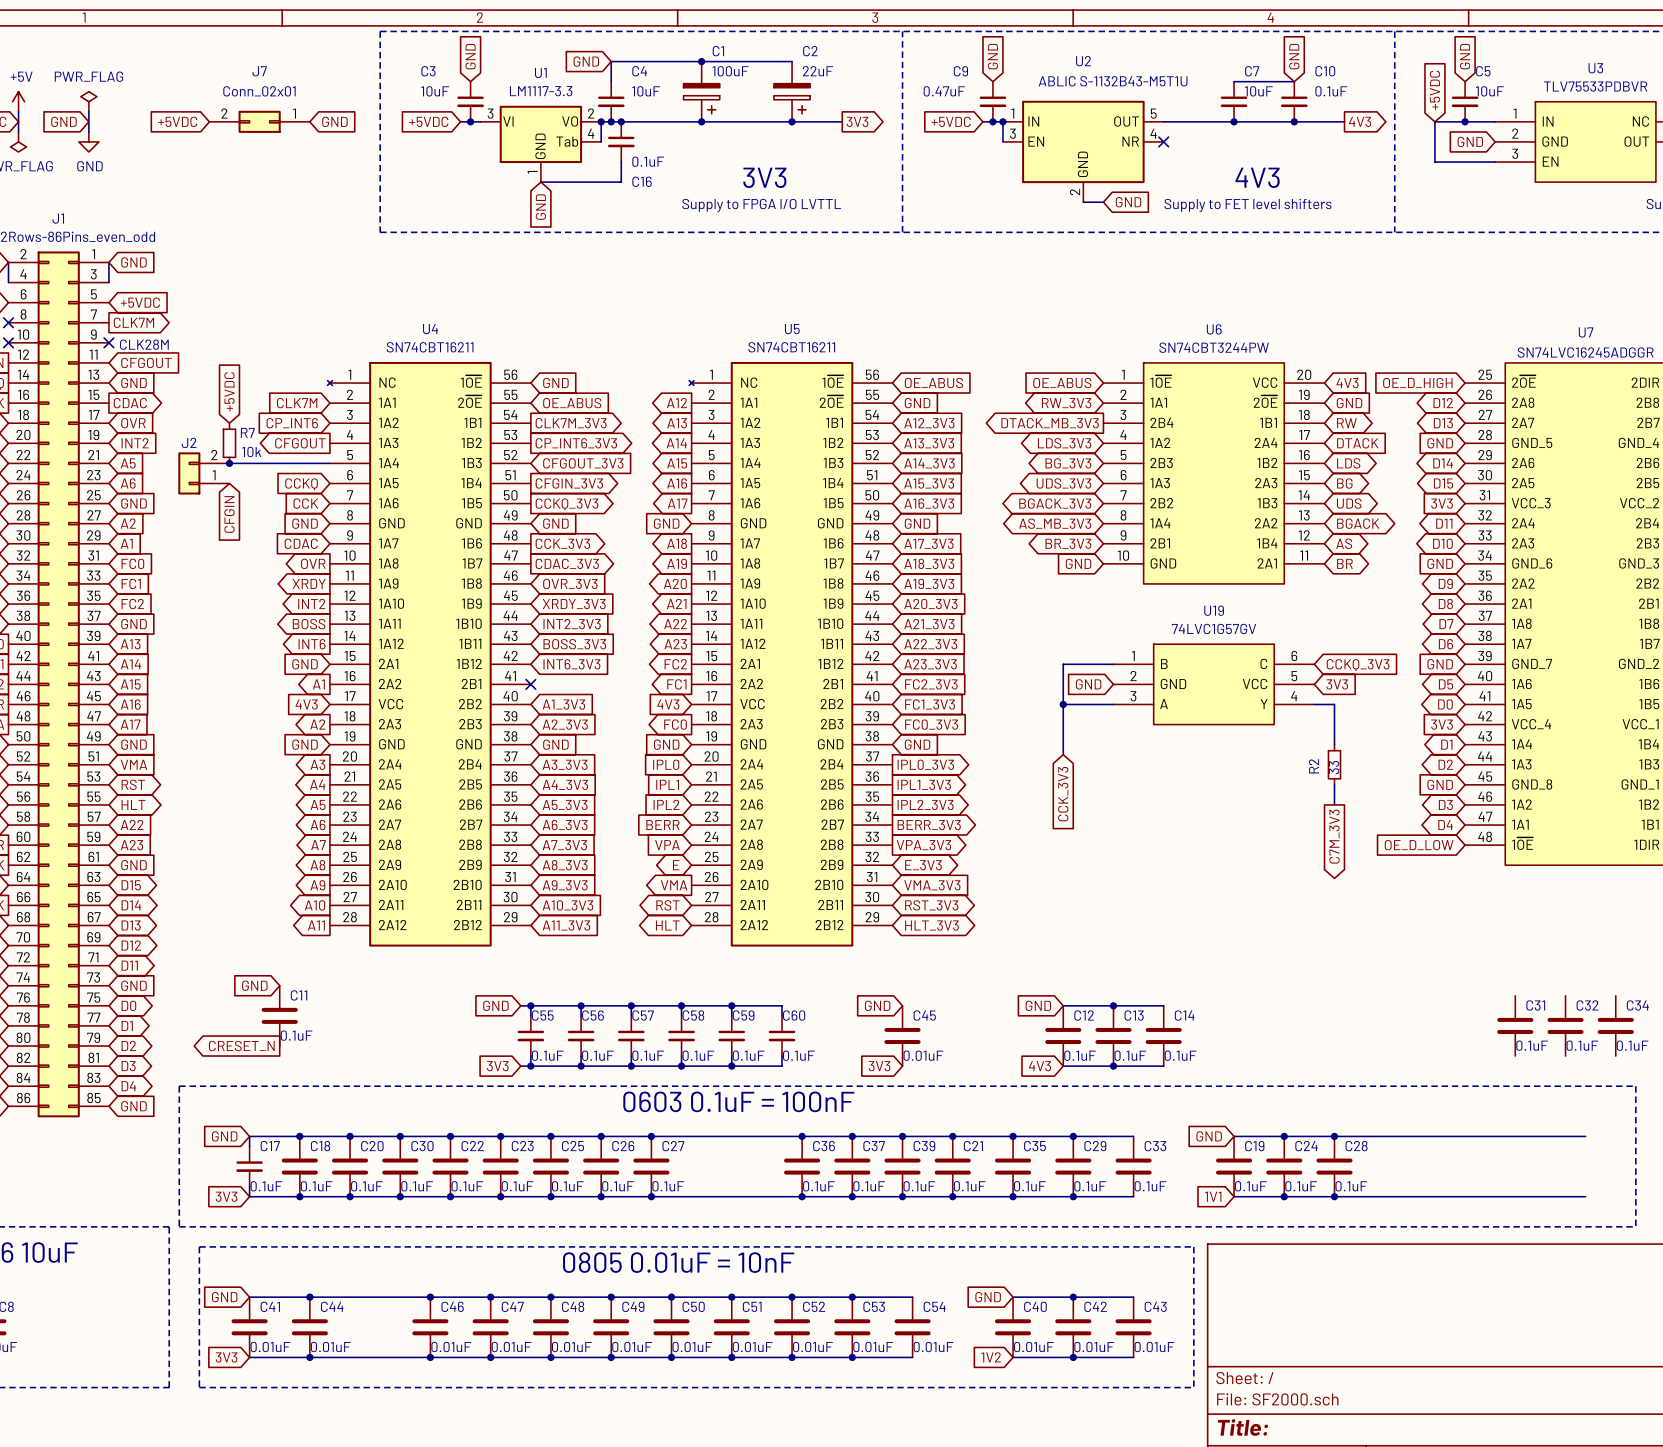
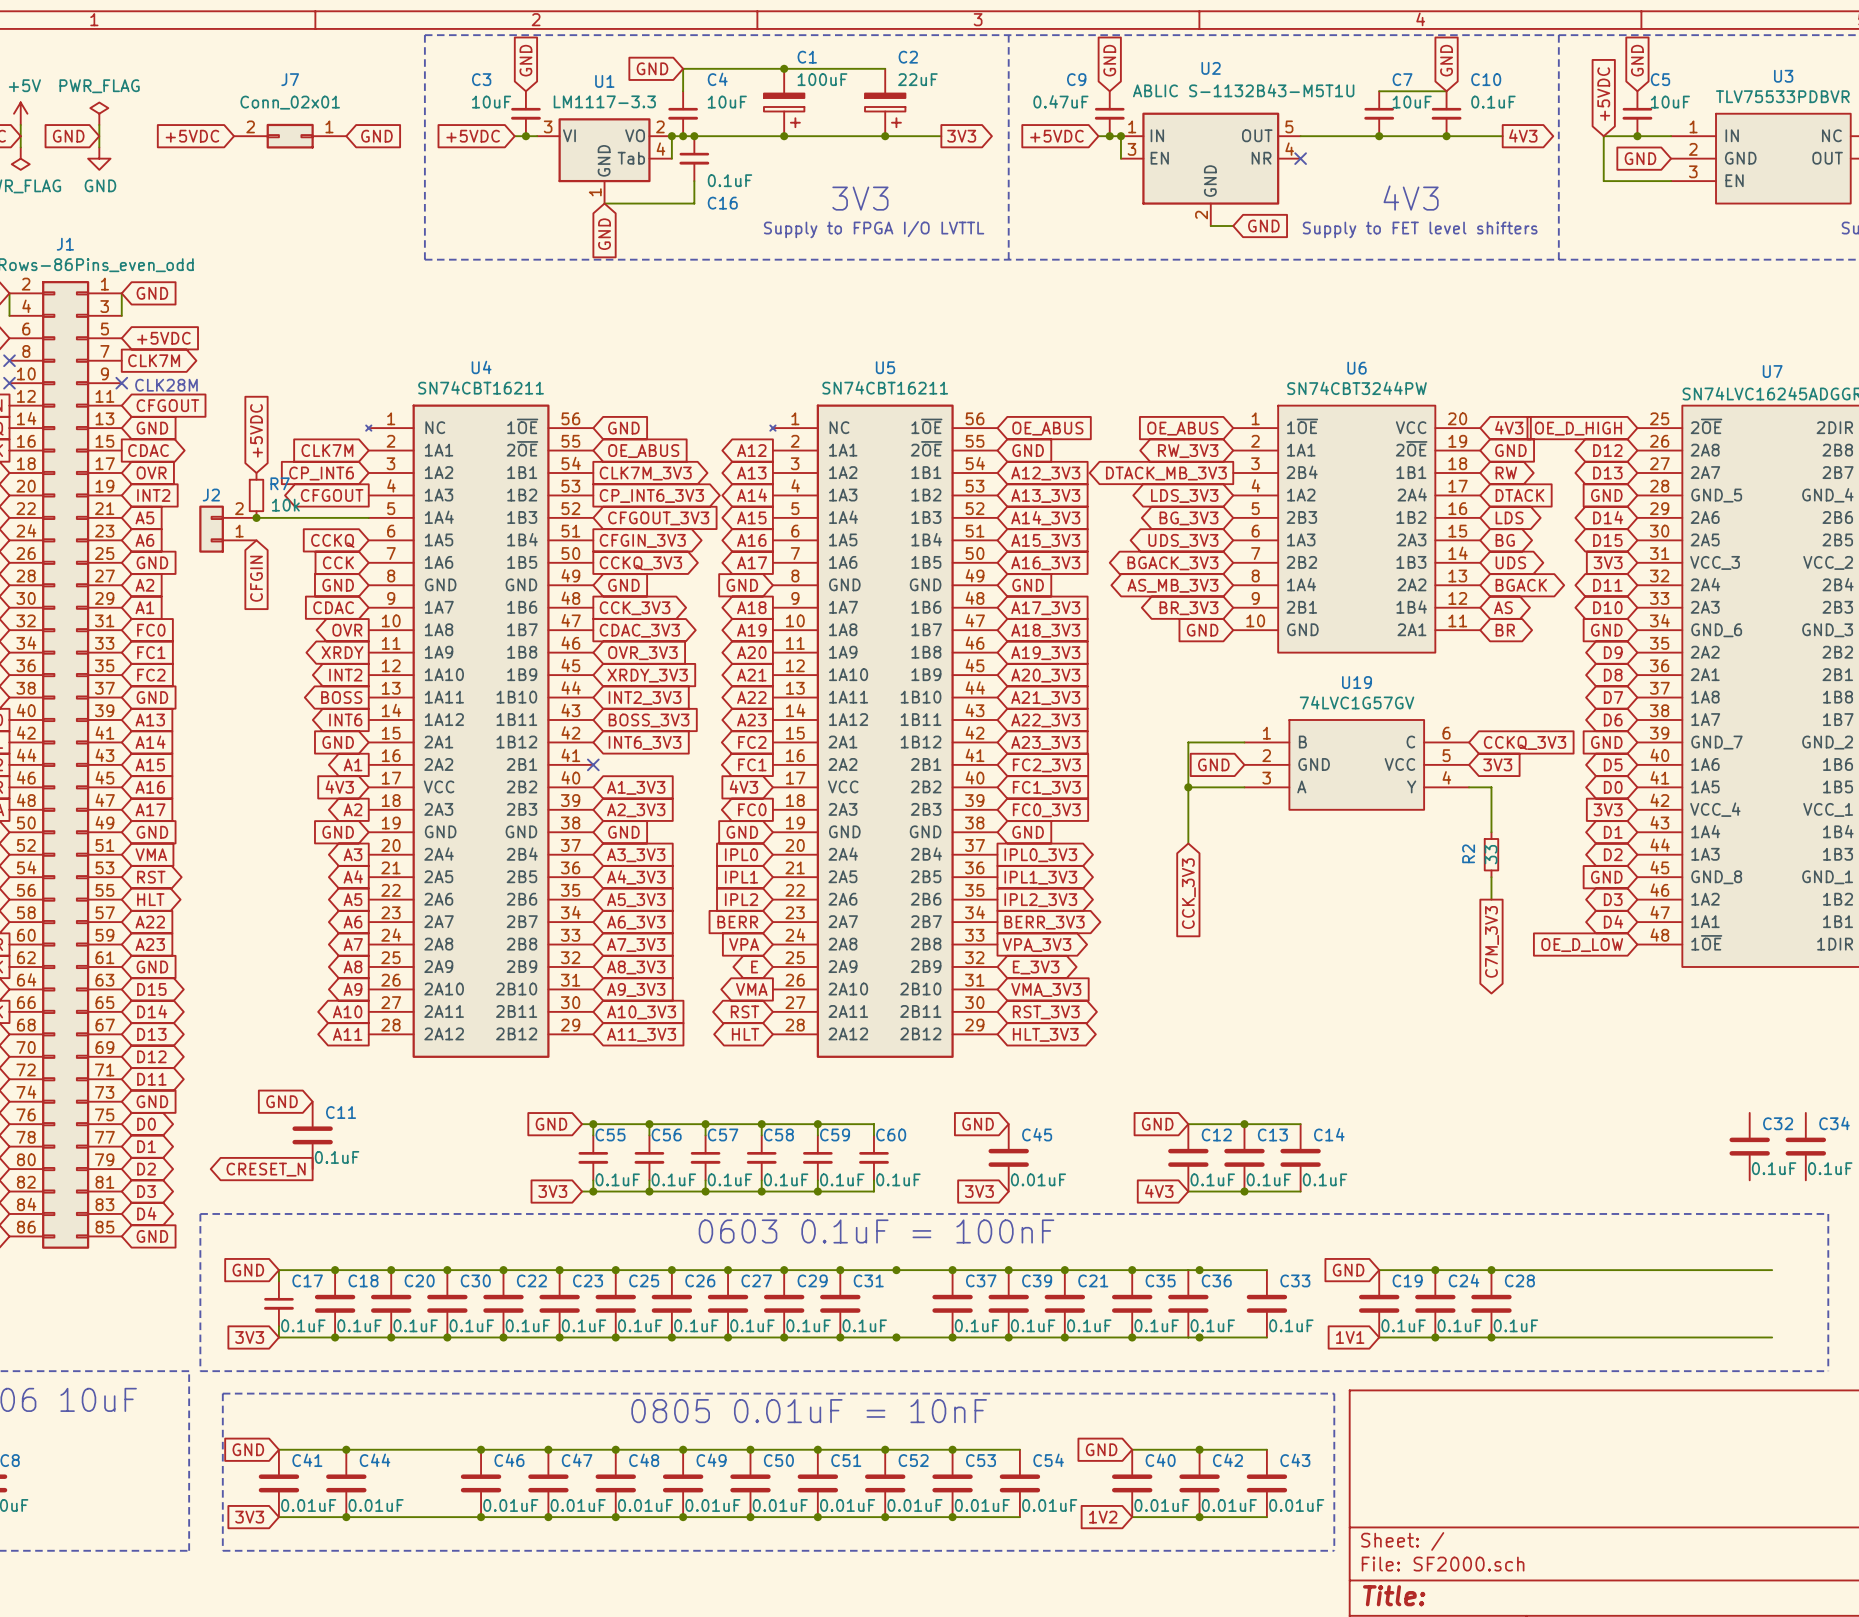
C31 position: (1515, 1025) -> (840, 1303)
junction: none -> (784, 1270)
junction: none -> (840, 1270)
C36 position: (802, 1166) -> (1188, 1303)
C29 position: (1073, 1166) -> (784, 1303)
junction: none -> (784, 1337)
junction: none -> (840, 1337)

